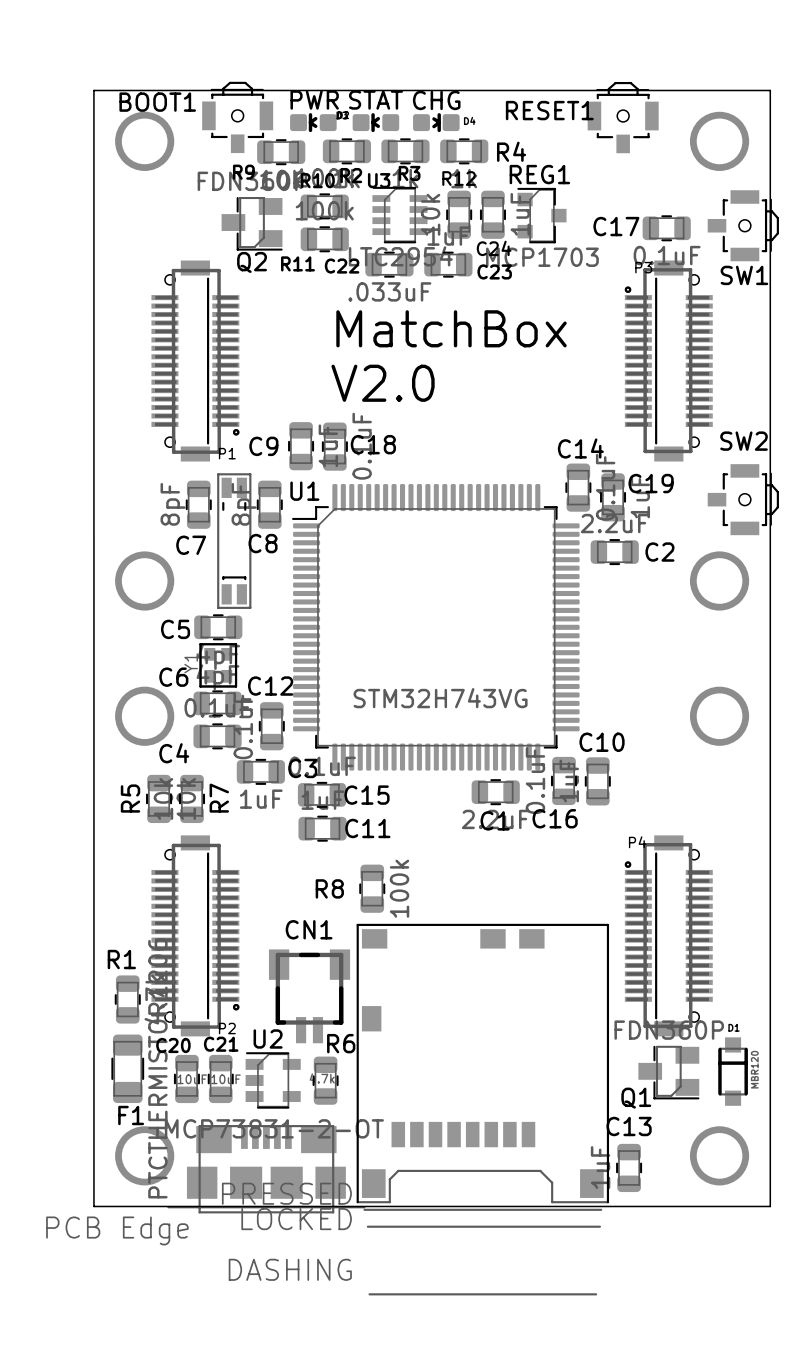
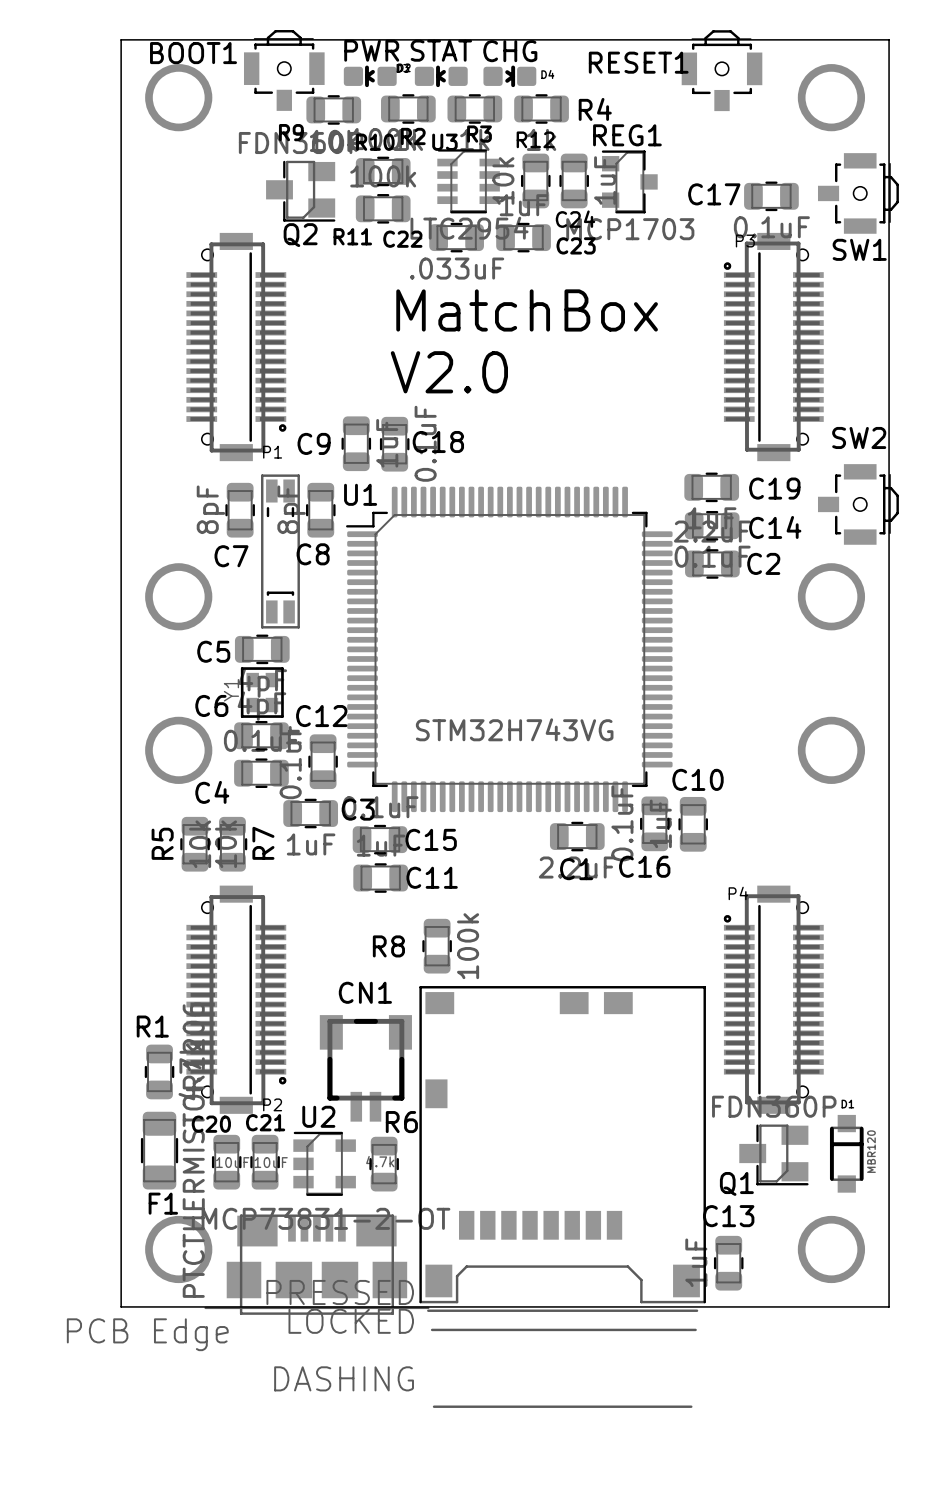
C14 rotation: 0° (578, 487) -> 90° clockwise (712, 525)
C14 position: (578, 487) -> (712, 525)
C19 rotation: 0° (613, 497) -> 90° clockwise (711, 487)

